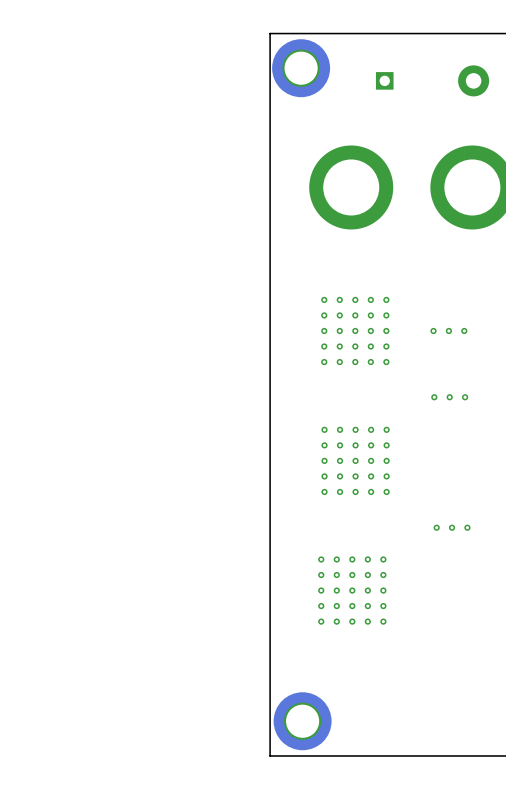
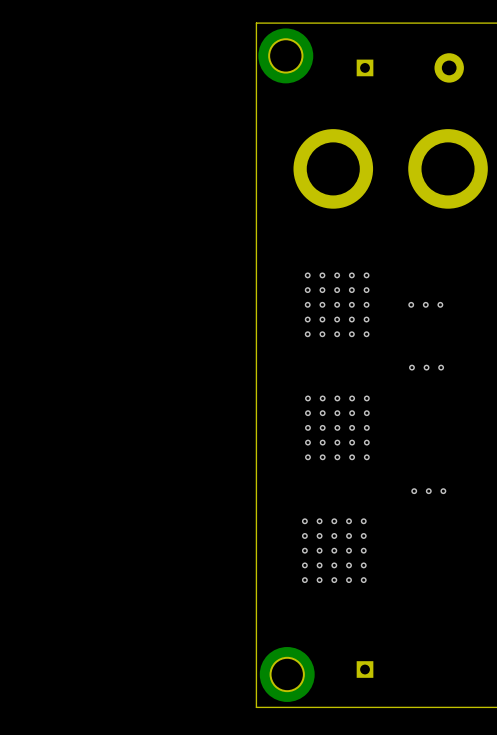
part: none -> (365, 669)

